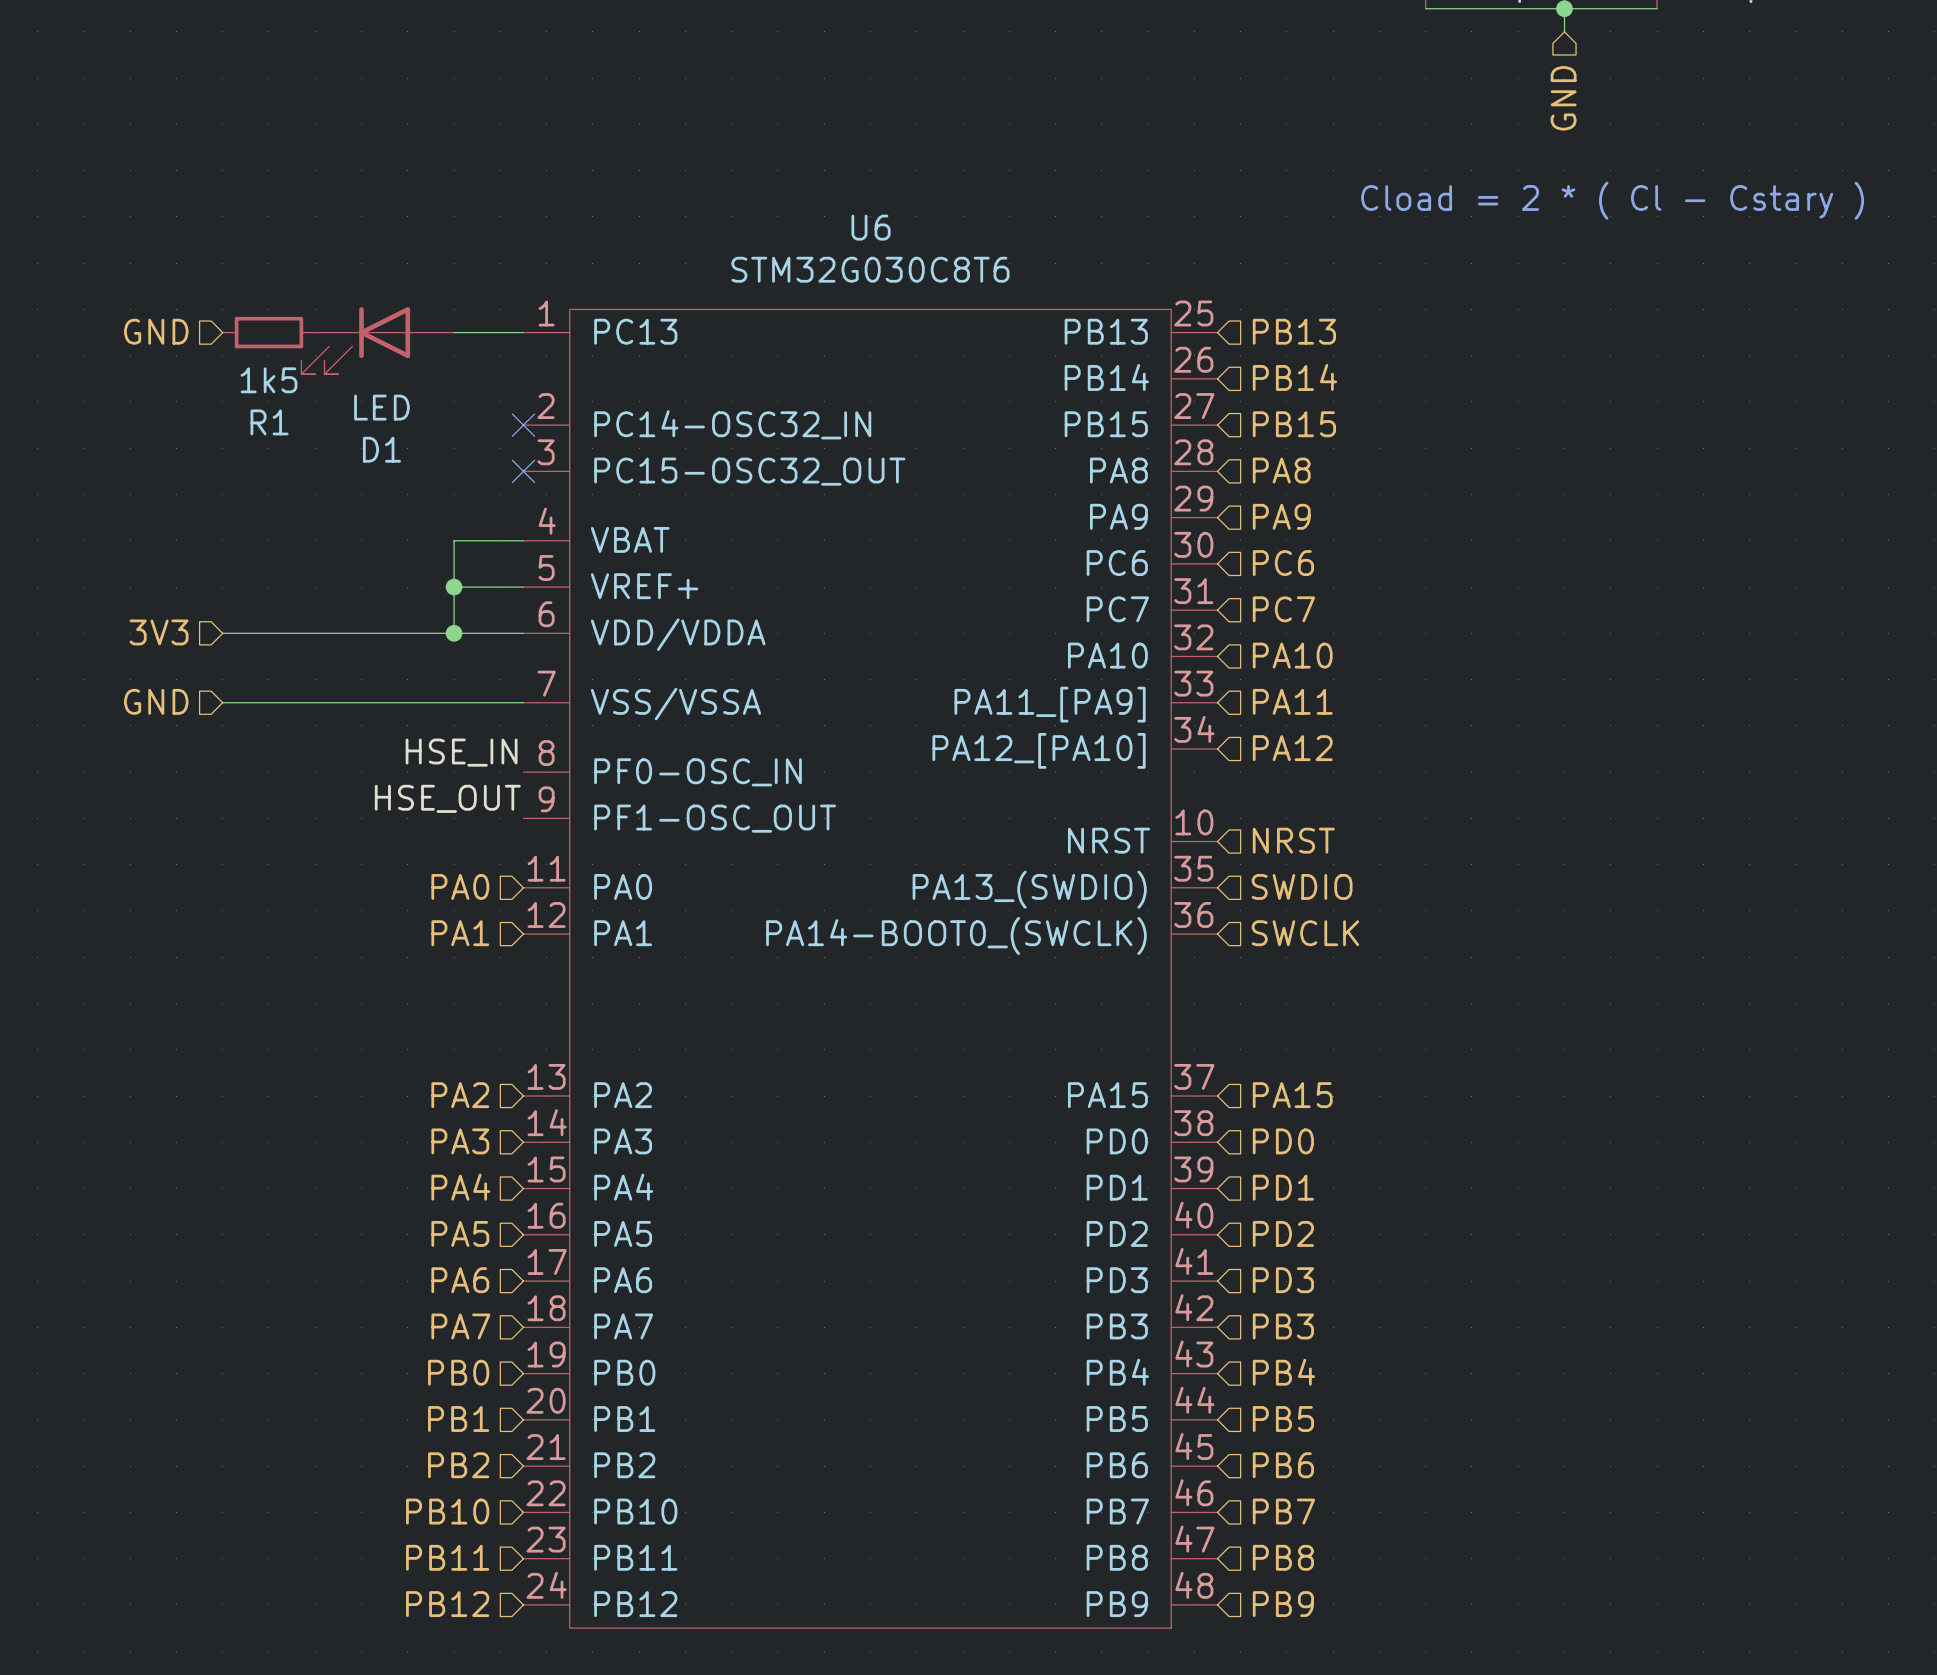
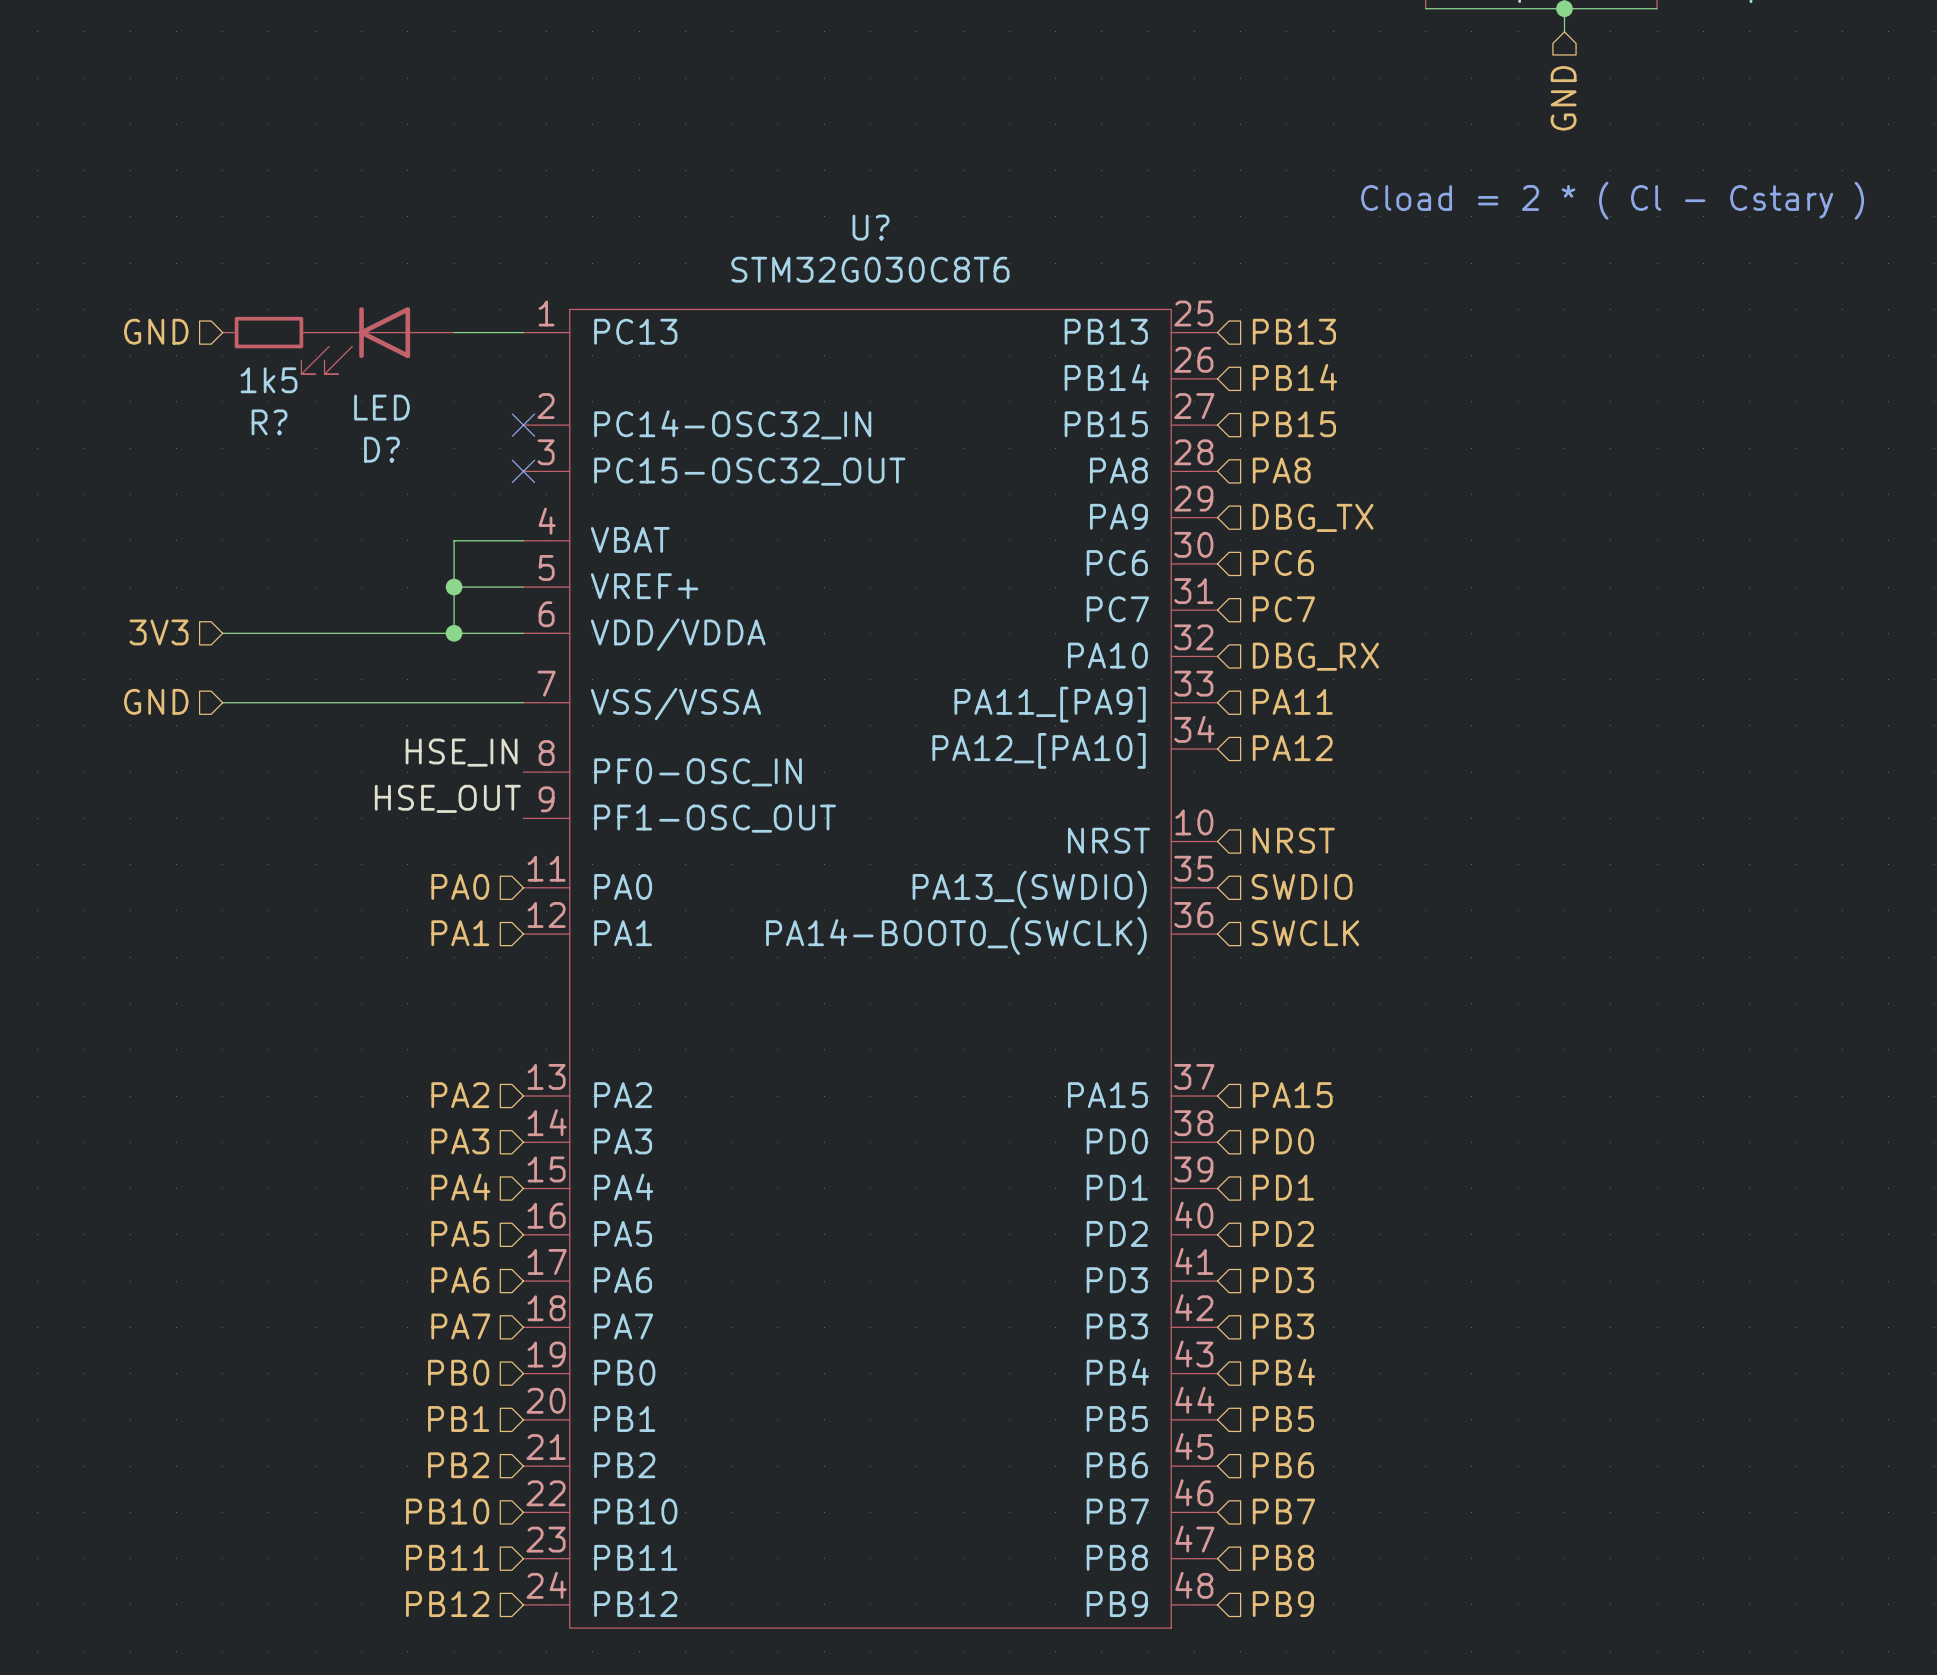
U6 name: U6 (871, 227) -> U? (871, 227)
R1 name: R1 (269, 422) -> R? (269, 422)
D1 name: D1 (381, 449) -> D? (381, 449)
hierarchical label: PA9 (1281, 516) -> DBG_TX (1313, 517)
hierarchical label: PA10 (1292, 655) -> DBG_RX (1315, 656)

